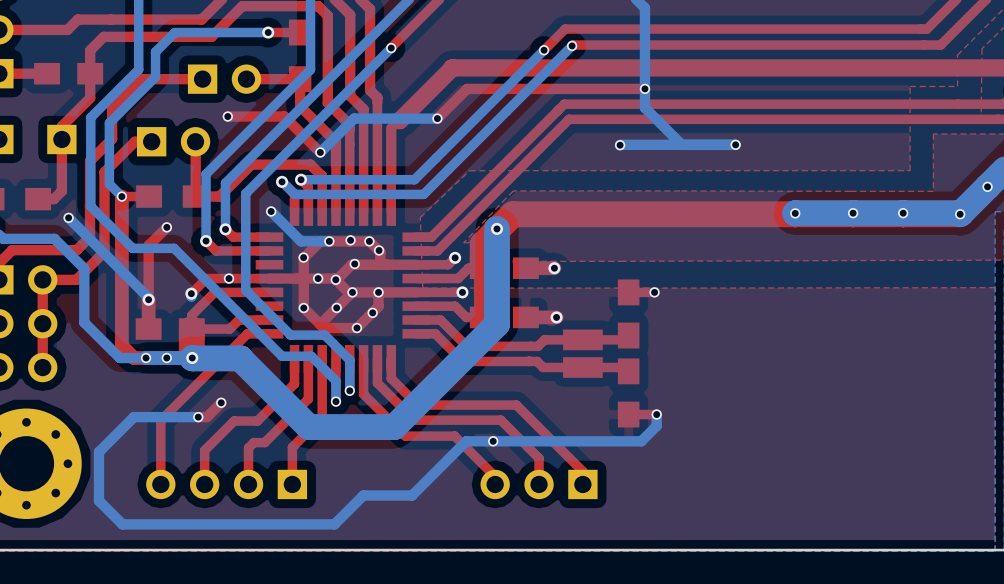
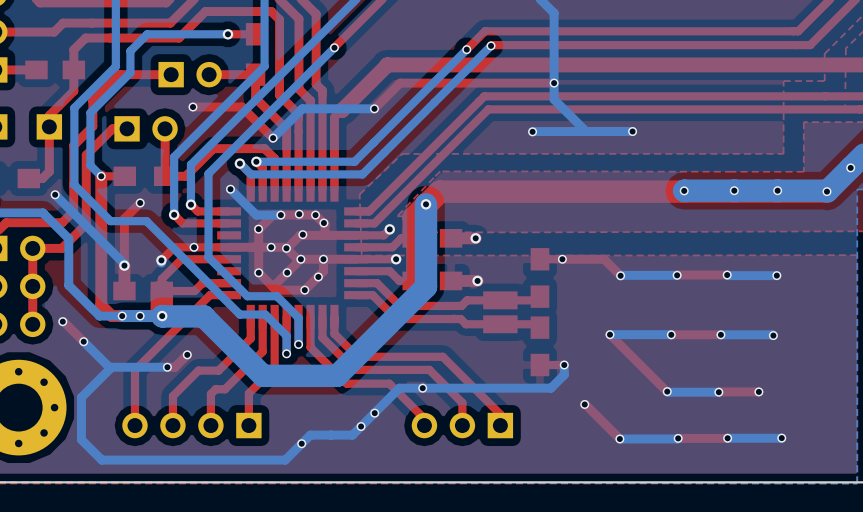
top track: none -> (562, 259) (604, 259) (620, 275)
bottom track: none -> (677, 275) (620, 275)
via: none -> (677, 275)
bottom track: none -> (727, 275) (776, 275)
top track: none -> (727, 275) (677, 275)
via: none -> (727, 275)
via: none -> (620, 275)
via: none -> (776, 275)
top track: none -> (62, 321) (83, 341)
via: none -> (62, 321)
top track: none -> (610, 334) (666, 391)
via: none -> (610, 334)
bottom track: none -> (671, 334) (610, 334)
via: none -> (671, 334)
bottom track: none -> (720, 334) (773, 335)
top track: none -> (720, 334) (671, 334)
via: none -> (720, 334)
via: none -> (773, 335)
bottom track: none -> (83, 341) (110, 368)
via: none -> (83, 341)
bottom track: none -> (667, 391) (718, 392)
via: none -> (667, 391)
via: none -> (718, 392)
top track: none -> (758, 391) (718, 392)
via: none -> (758, 391)
top track: none -> (584, 404) (619, 439)
via: none -> (584, 404)
via: none -> (374, 413)
via: none -> (361, 426)
via: none -> (781, 438)
bottom track: none -> (678, 438) (619, 439)
via: none -> (678, 438)
top track: none -> (727, 438) (678, 438)
via: none -> (727, 438)
bottom track: none -> (781, 438) (727, 438)
via: none -> (619, 439)
via: none -> (301, 443)

